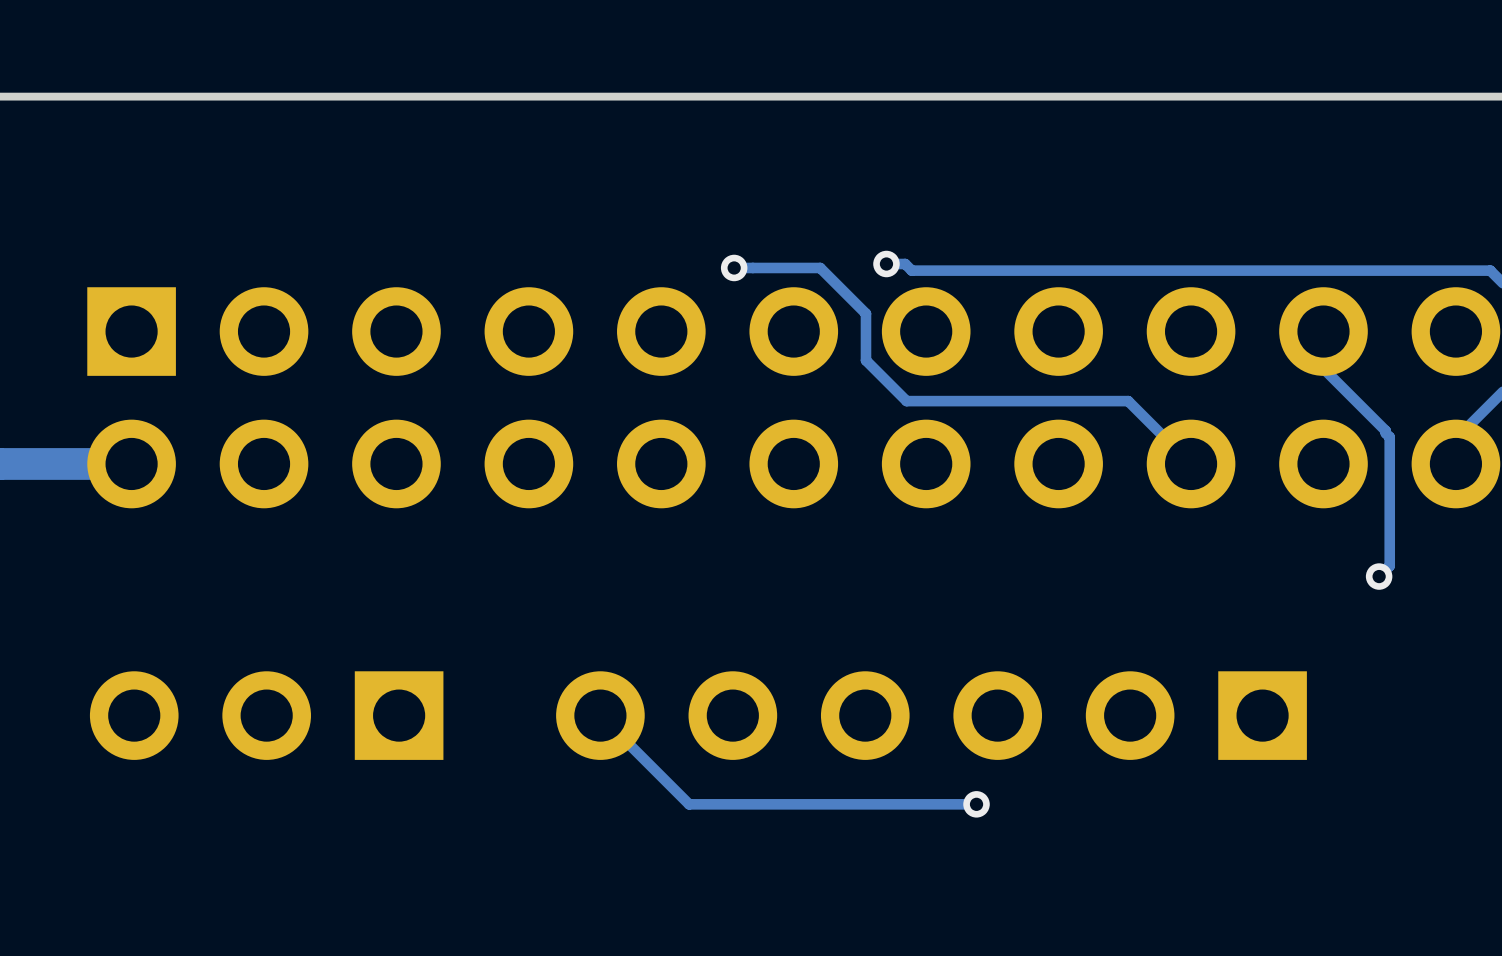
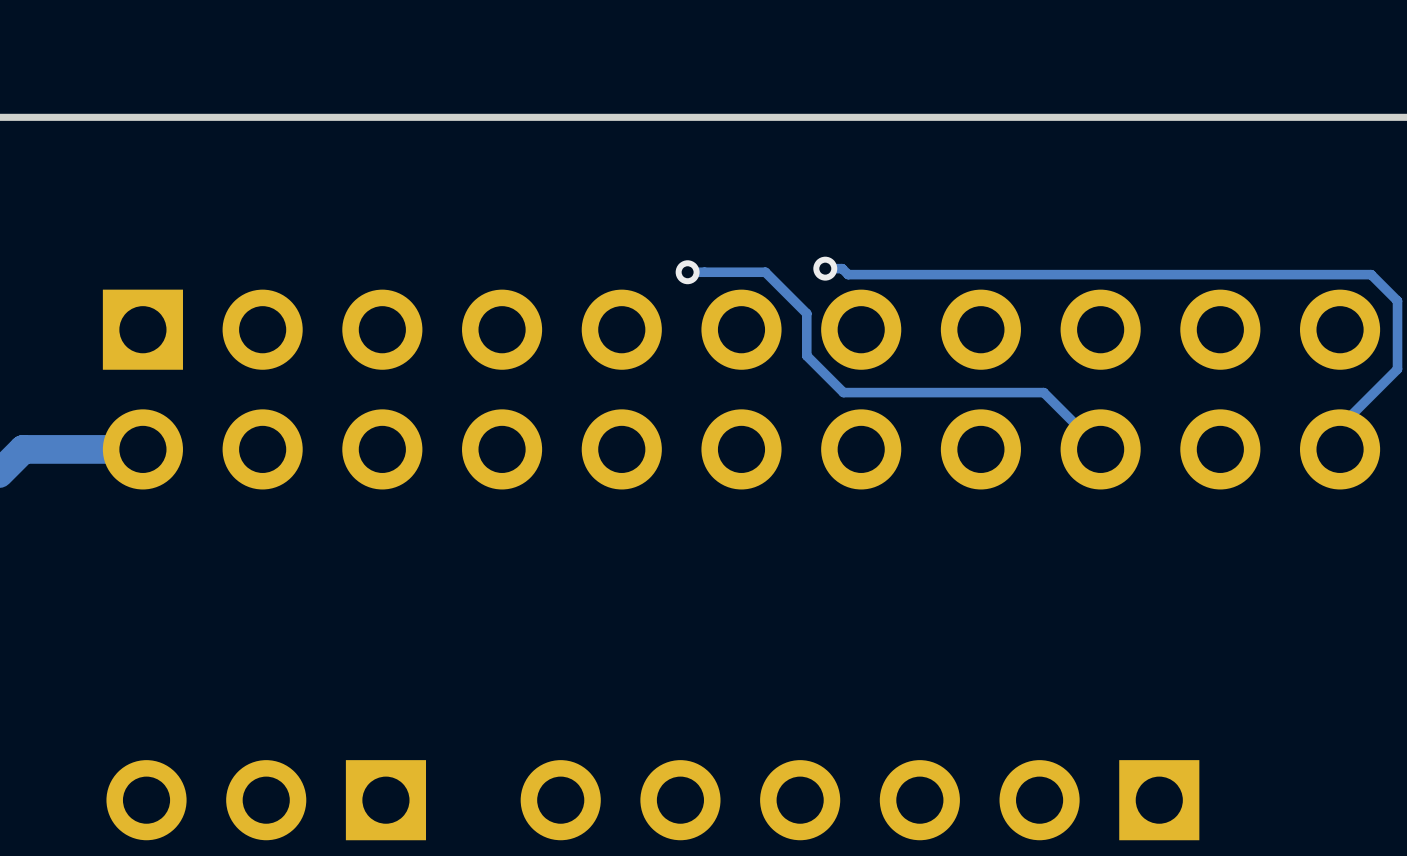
track: (1323, 331) (1323, 368) (1385, 430) (1389, 437) (1389, 565) (1379, 576) -> none
via: (1379, 576) -> none
part position: (266, 715) -> (266, 800)
track: (600, 715) (689, 804) (976, 804) -> none
part position: (931, 715) -> (860, 800)
via: (976, 804) -> none

